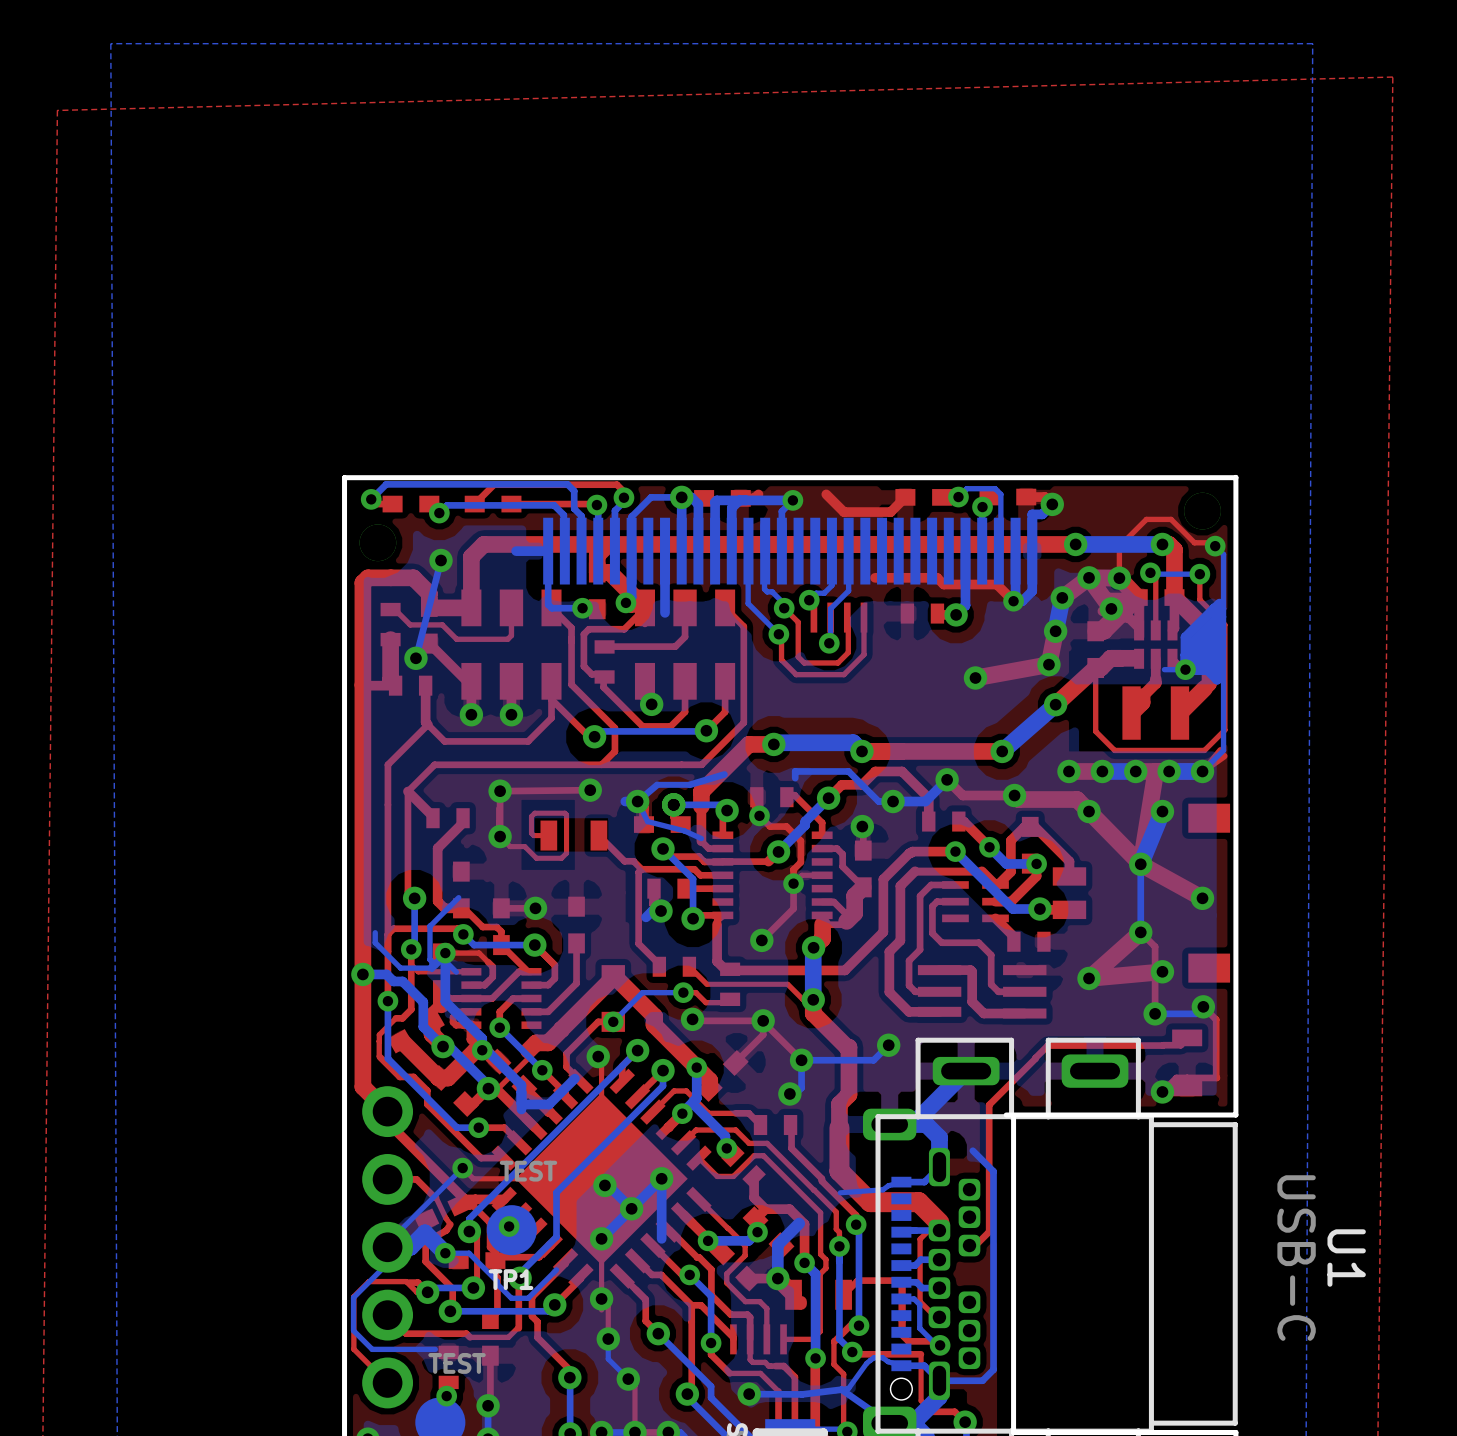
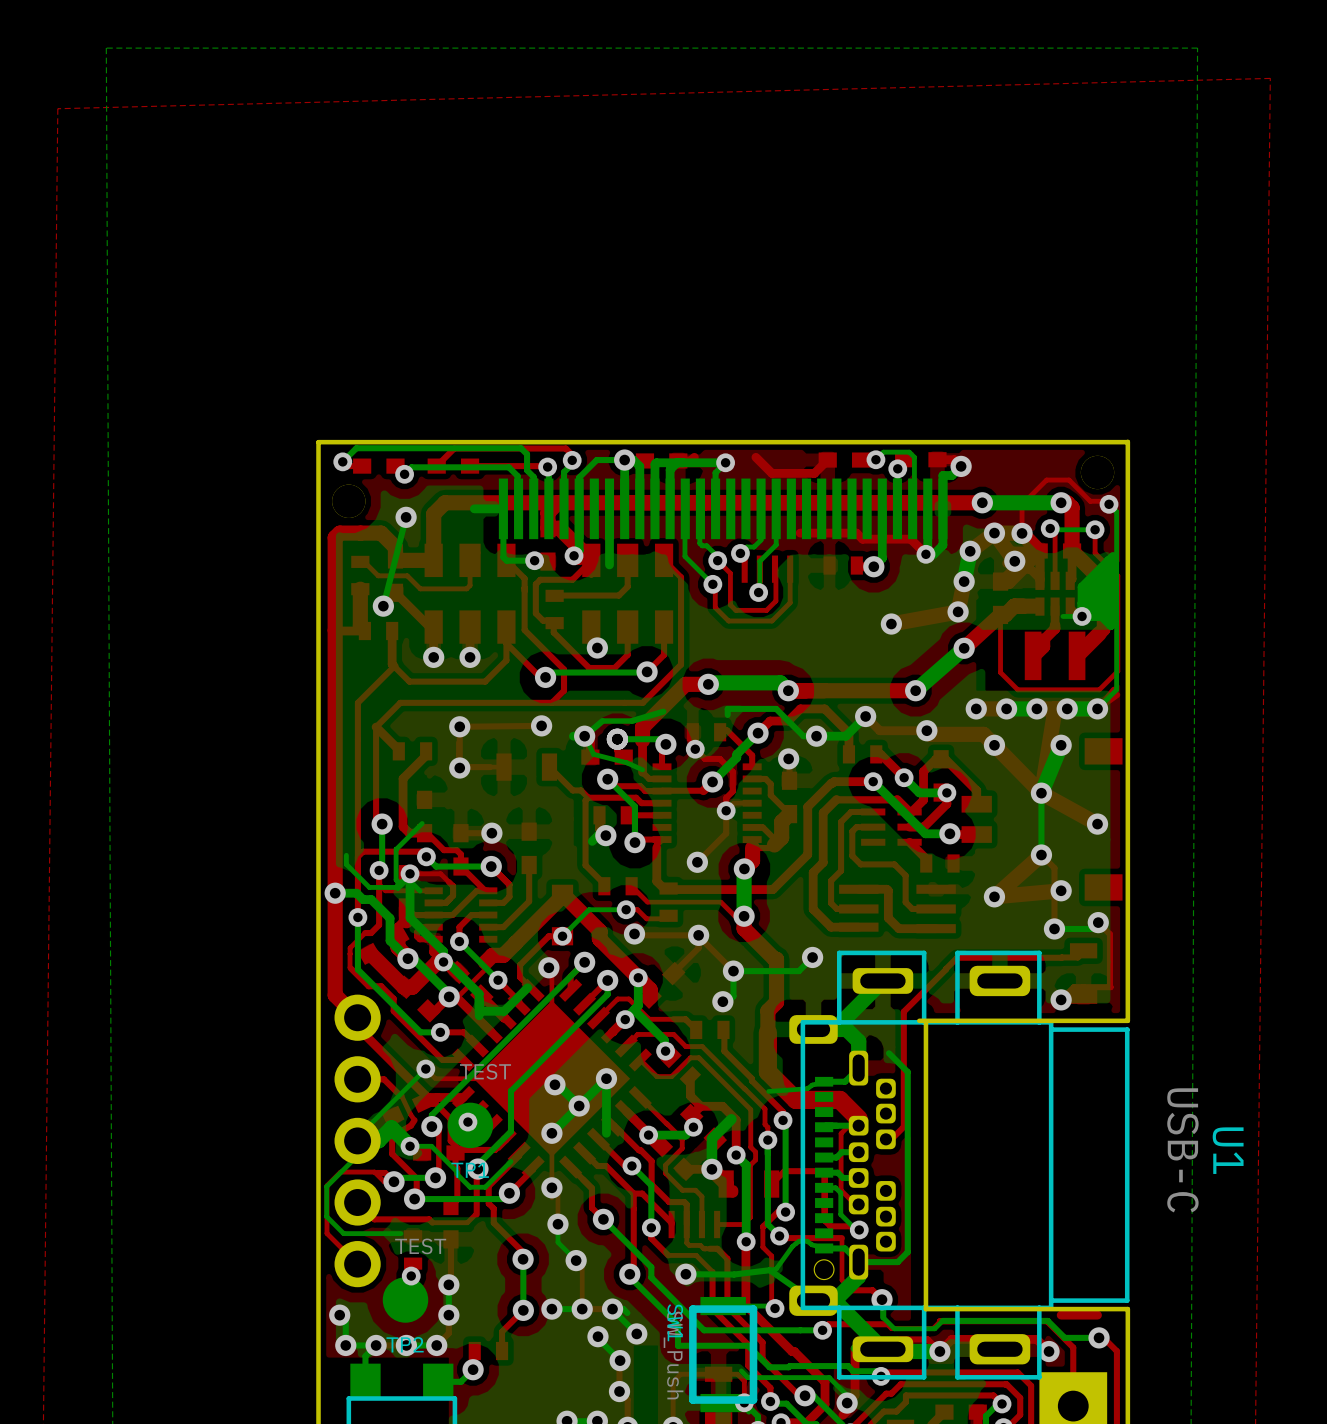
top track: (533, 835) (531, 833) (531, 816) (534, 813) (564, 813) (566, 814) (566, 853) (561, 858) (536, 858) (524, 846) (510, 846) (500, 836) -> (490, 767) (460, 767)

